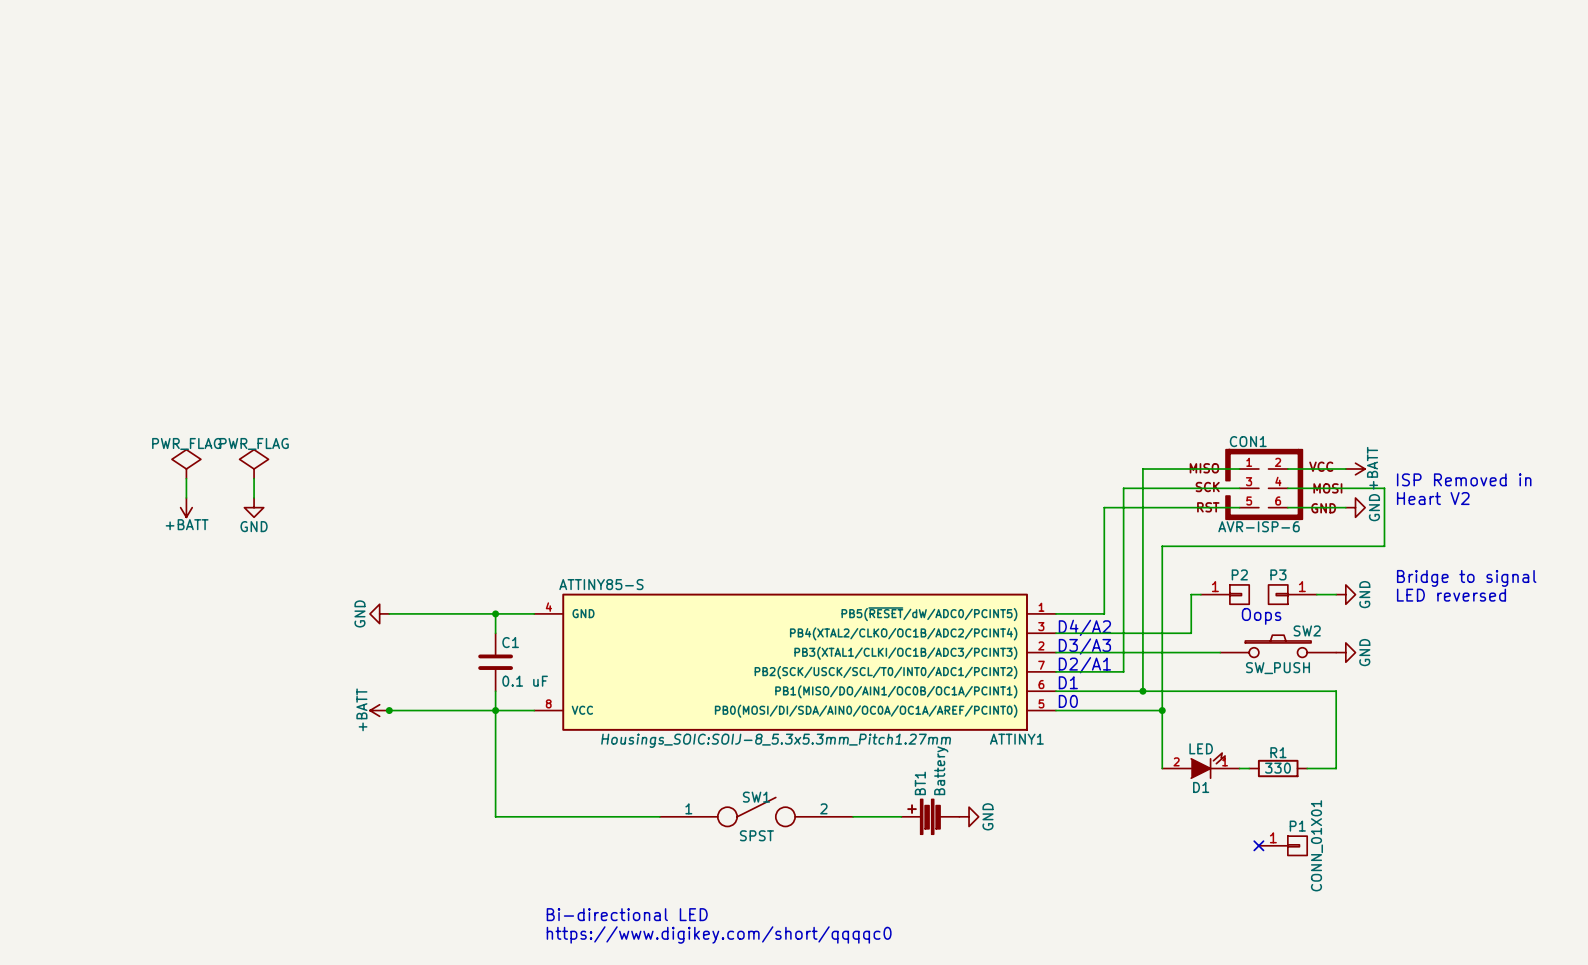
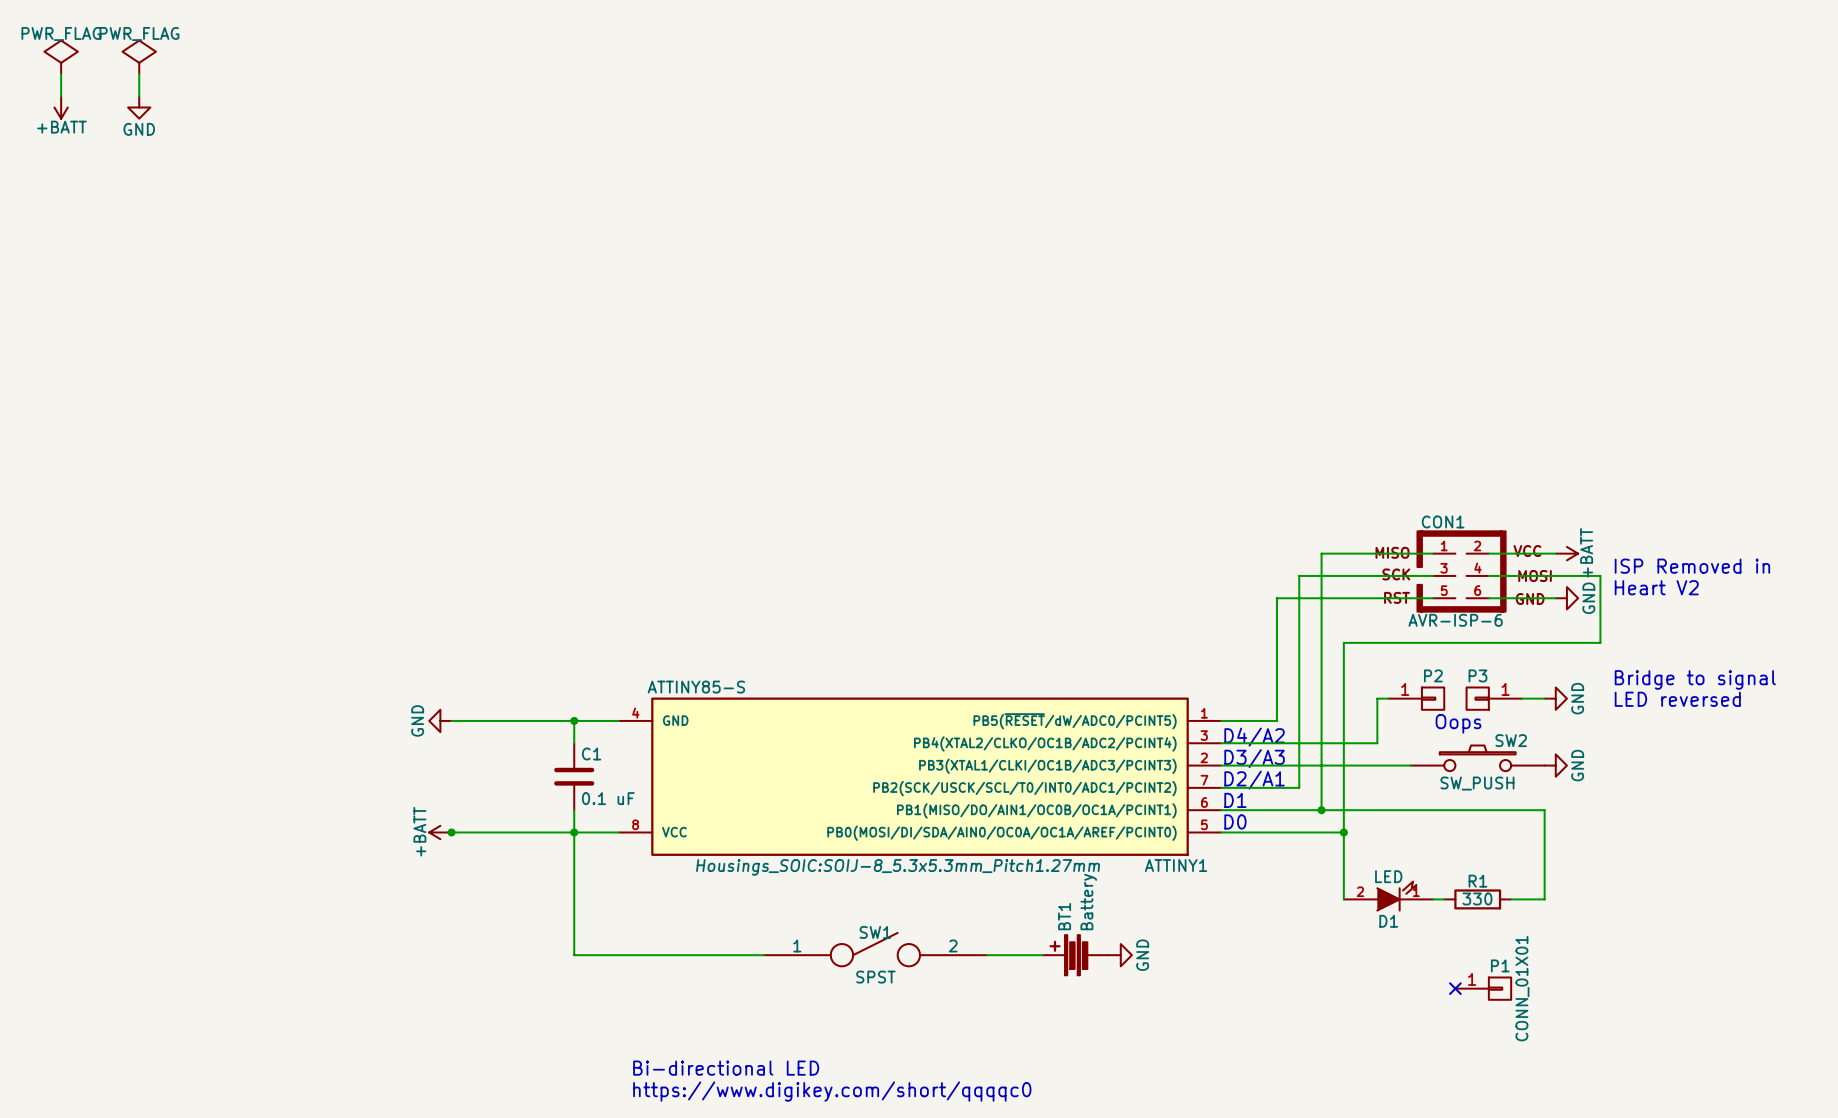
power symbol: none -> PWR_FLAG (61, 57)
power symbol: none -> PWR_FLAG (139, 57)
wire: none -> (61, 74) (61, 96)
wire: none -> (139, 74) (139, 96)
power symbol: none -> +BATT (61, 107)
power symbol: none -> GND (139, 107)
power symbol: PWR_FLAG (186, 464) -> none
power symbol: PWR_FLAG (254, 464) -> none
wire: (186, 478) (186, 497) -> none
wire: (254, 478) (254, 497) -> none
power symbol: +BATT (186, 507) -> none
power symbol: GND (254, 507) -> none

